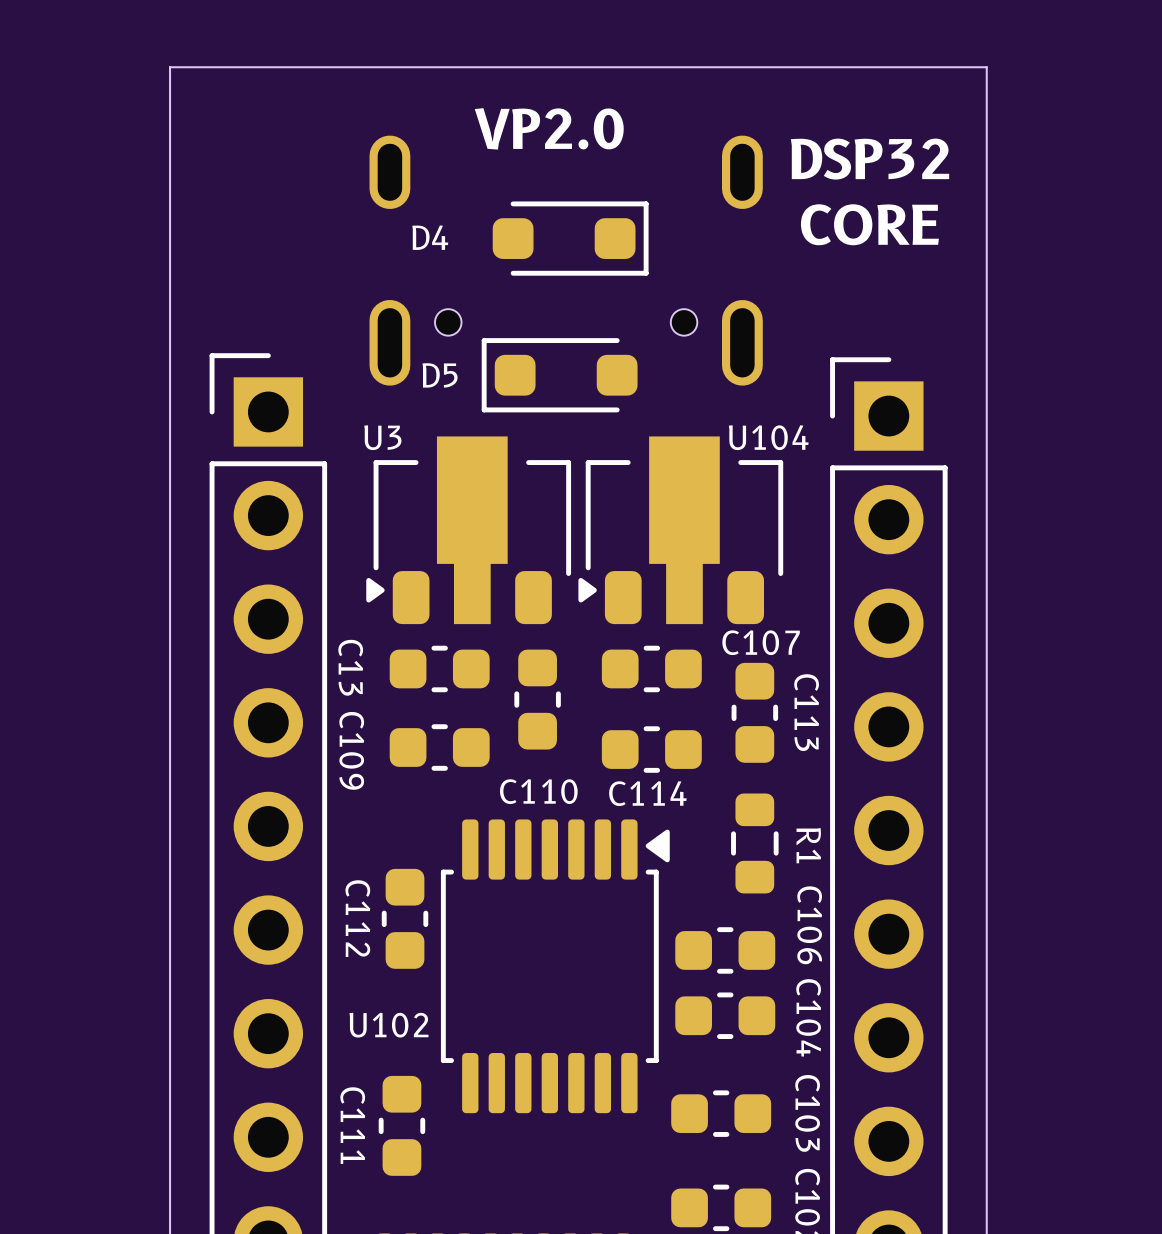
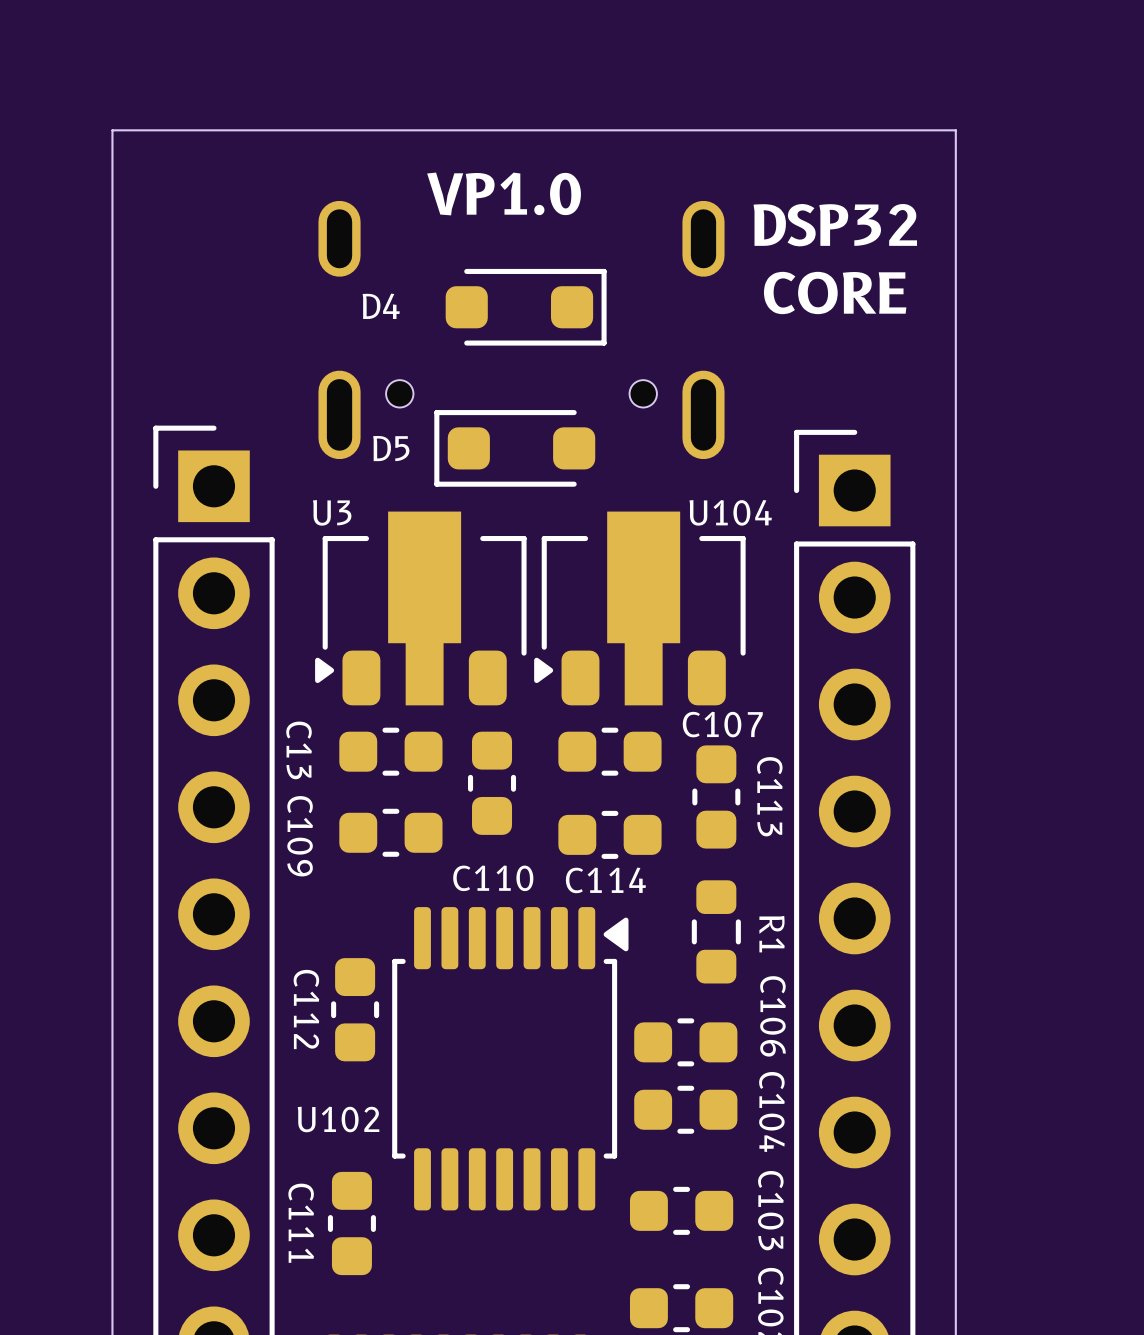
text: VP2.0 (549, 128) -> VP1.0 (504, 193)

